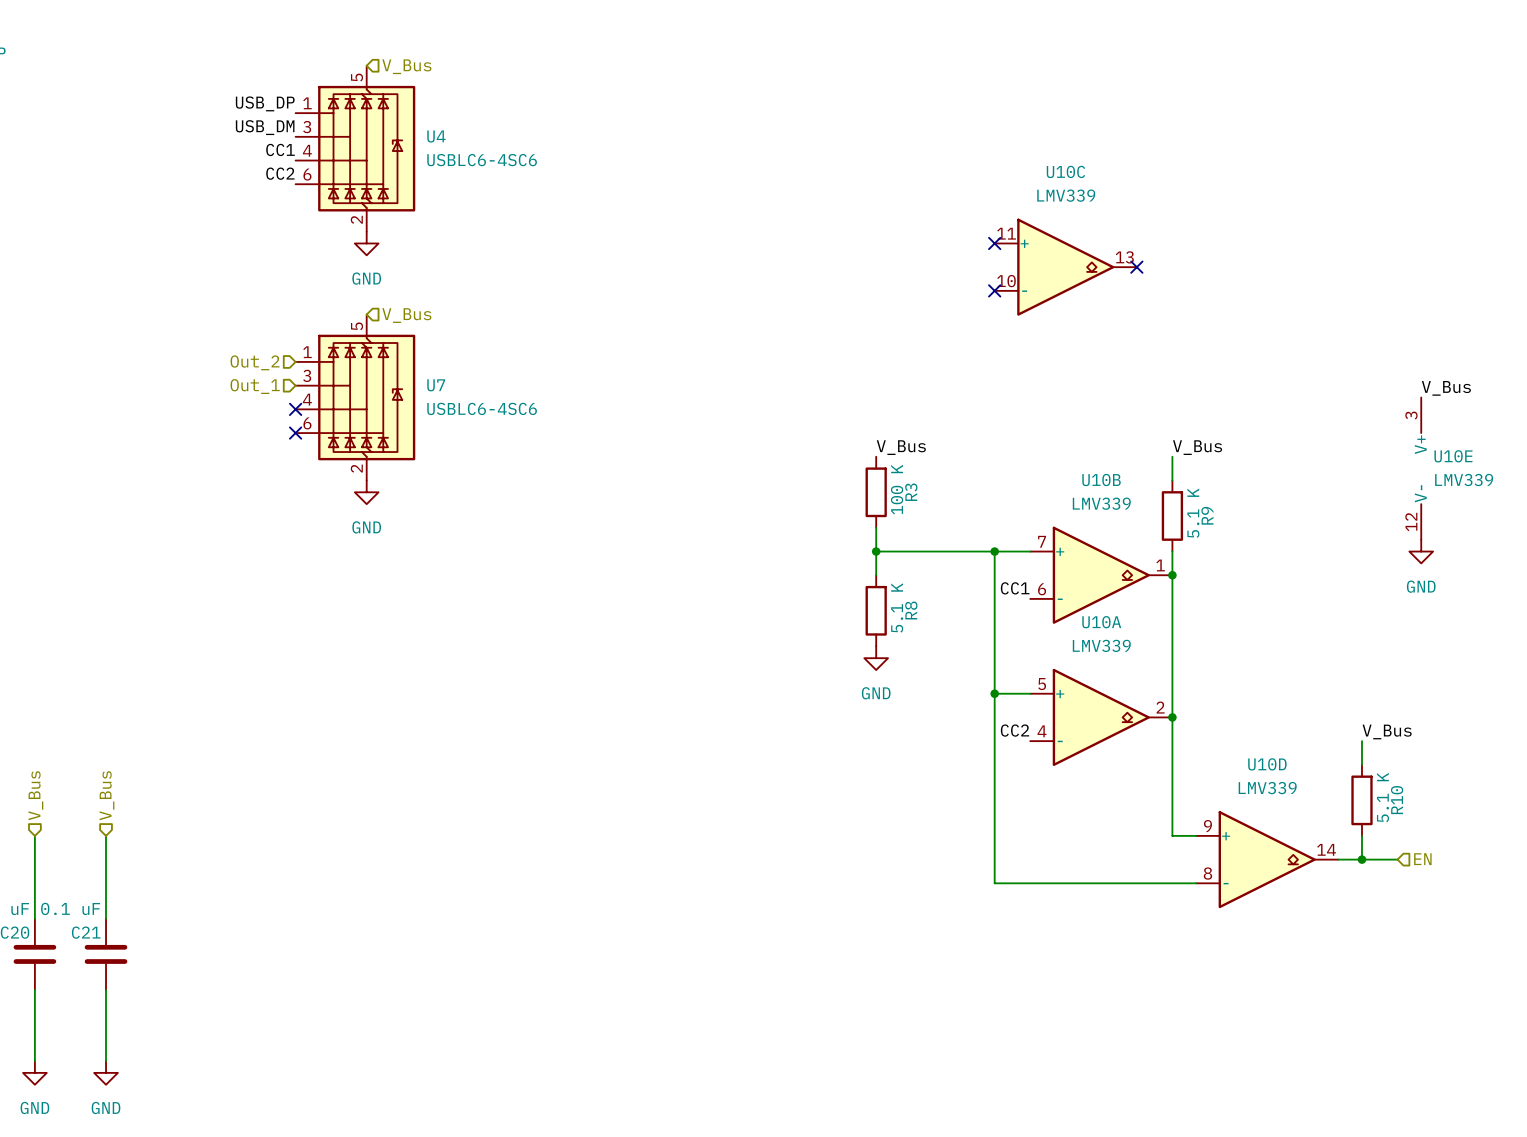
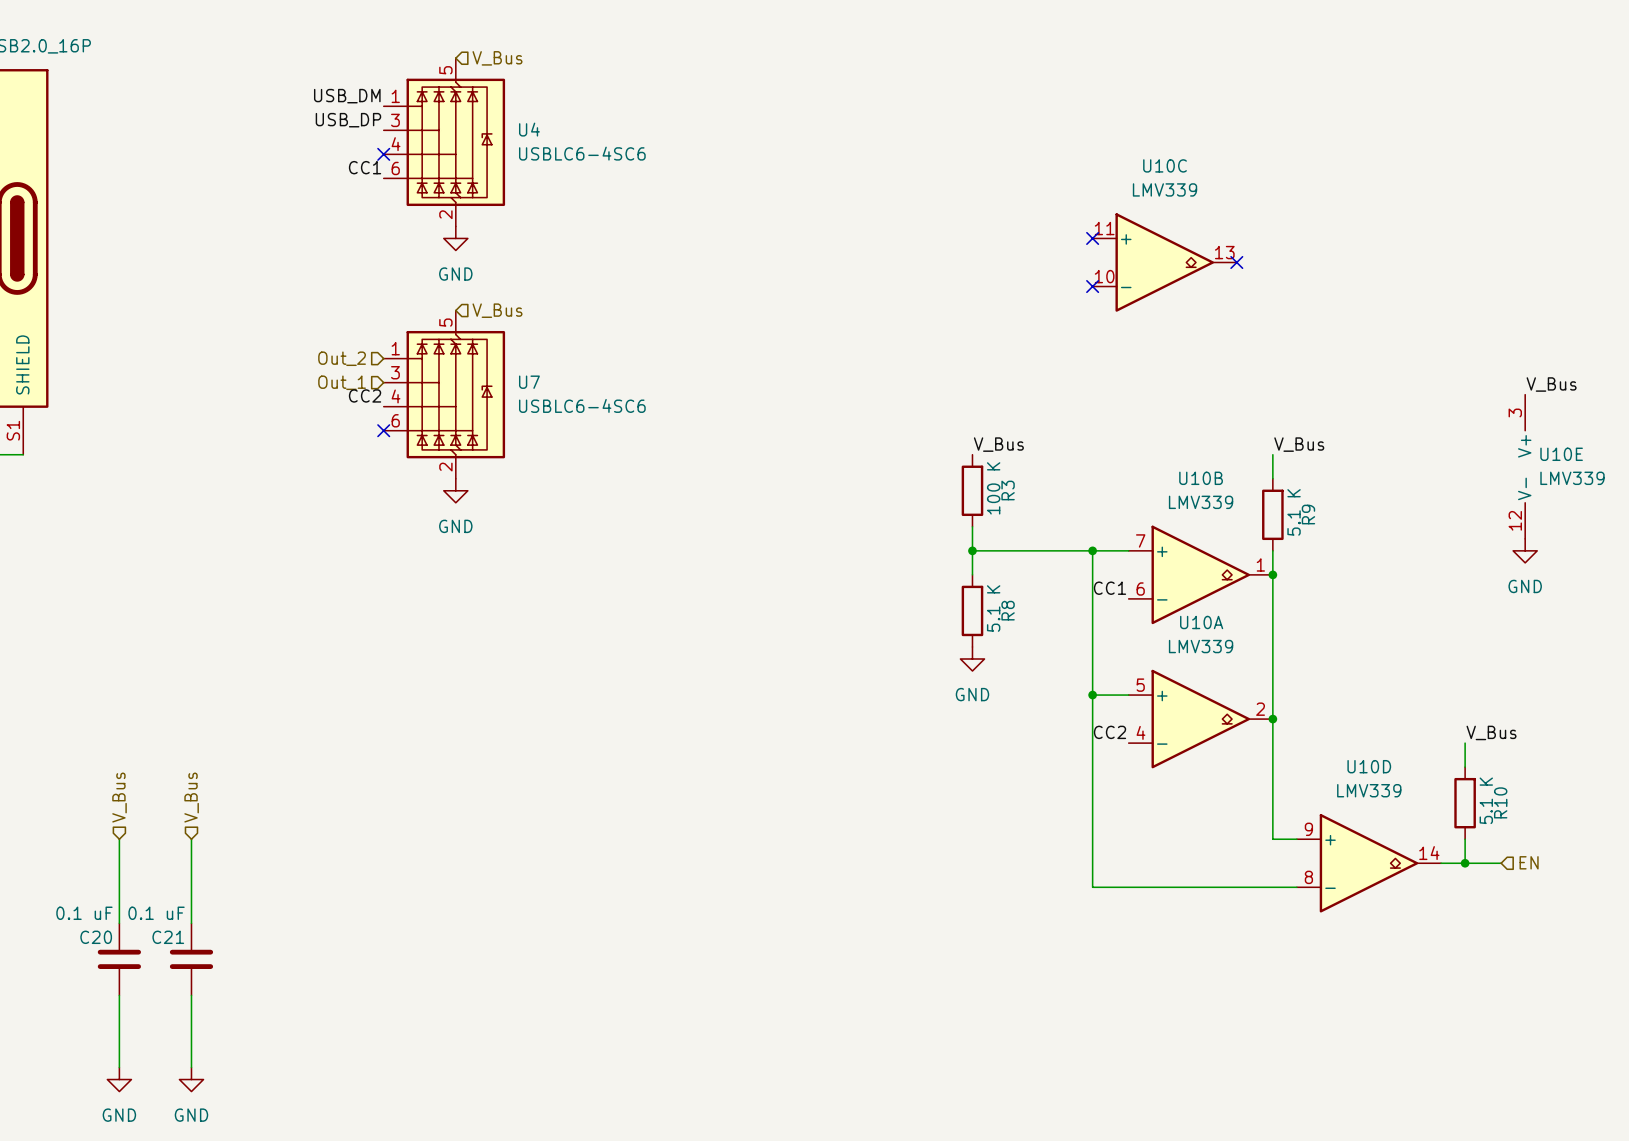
label: USB_DP (265, 103) -> USB_DM (347, 96)
label: USB_DM (265, 127) -> USB_DP (348, 120)
label: CC1 (280, 149) -> none
no-connect mark: none -> (383, 154)
label: CC2 (280, 173) -> CC1 (365, 167)
label: none -> CC2 (365, 395)
no-connect mark: (295, 409) -> none

